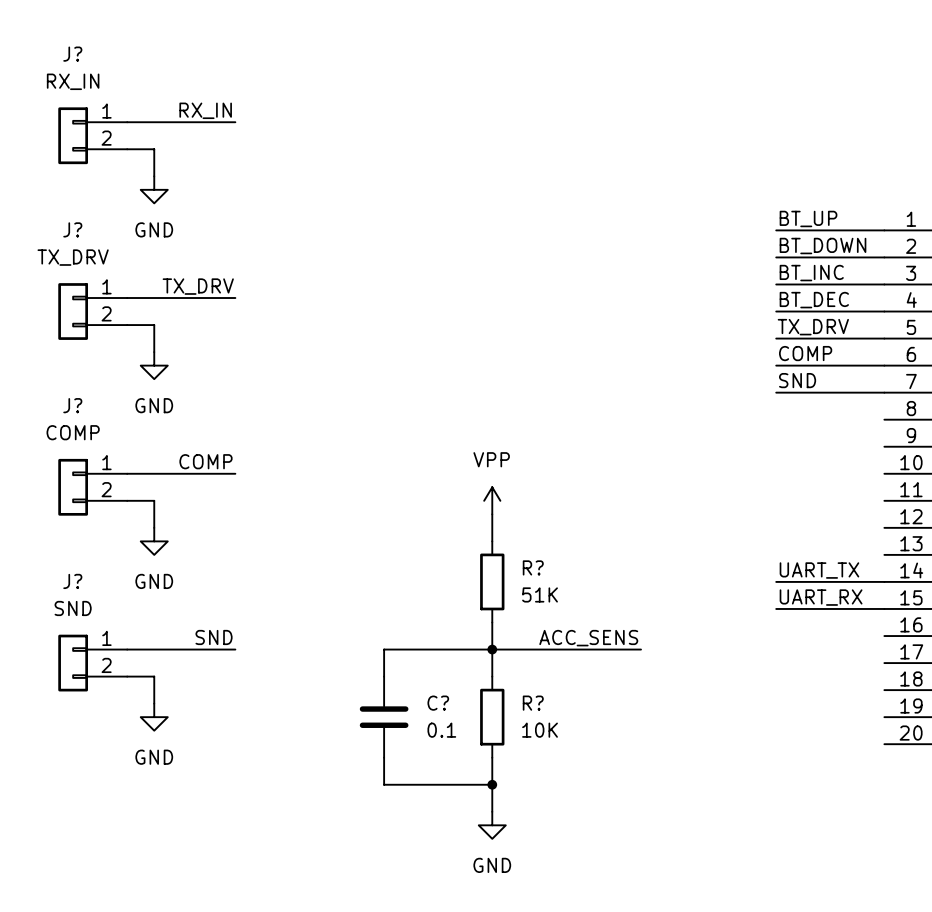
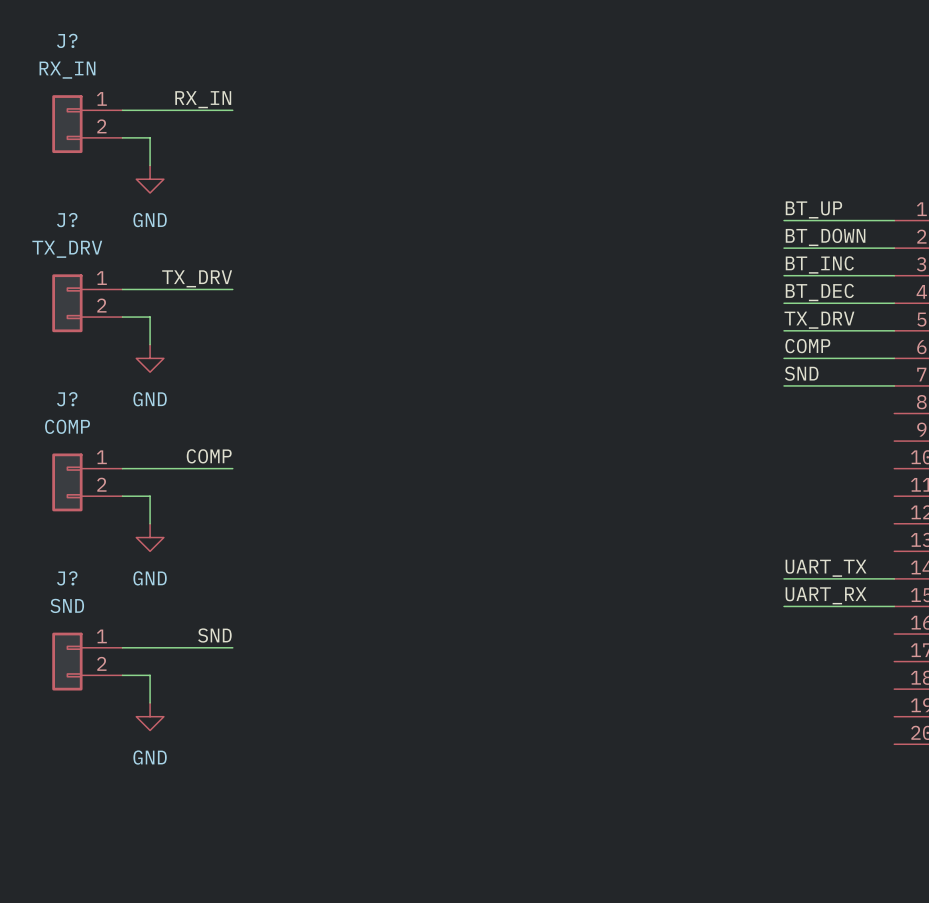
power symbol: VPP (492, 500) -> none
wire: (492, 514) (492, 541) -> none
R?: 51K (492, 581) -> none
wire: (492, 622) (492, 676) -> none
label: ACC_SENS (588, 638) -> none
junction: (492, 649) -> none
wire: (641, 649) (384, 649) (384, 676) -> none
C?: 0.1 (384, 717) -> none
R?: 10K (492, 717) -> none
wire: (384, 757) (384, 784) (492, 784) -> none
wire: (492, 757) (492, 811) -> none
junction: (492, 784) -> none
power symbol: GND (492, 825) -> none

